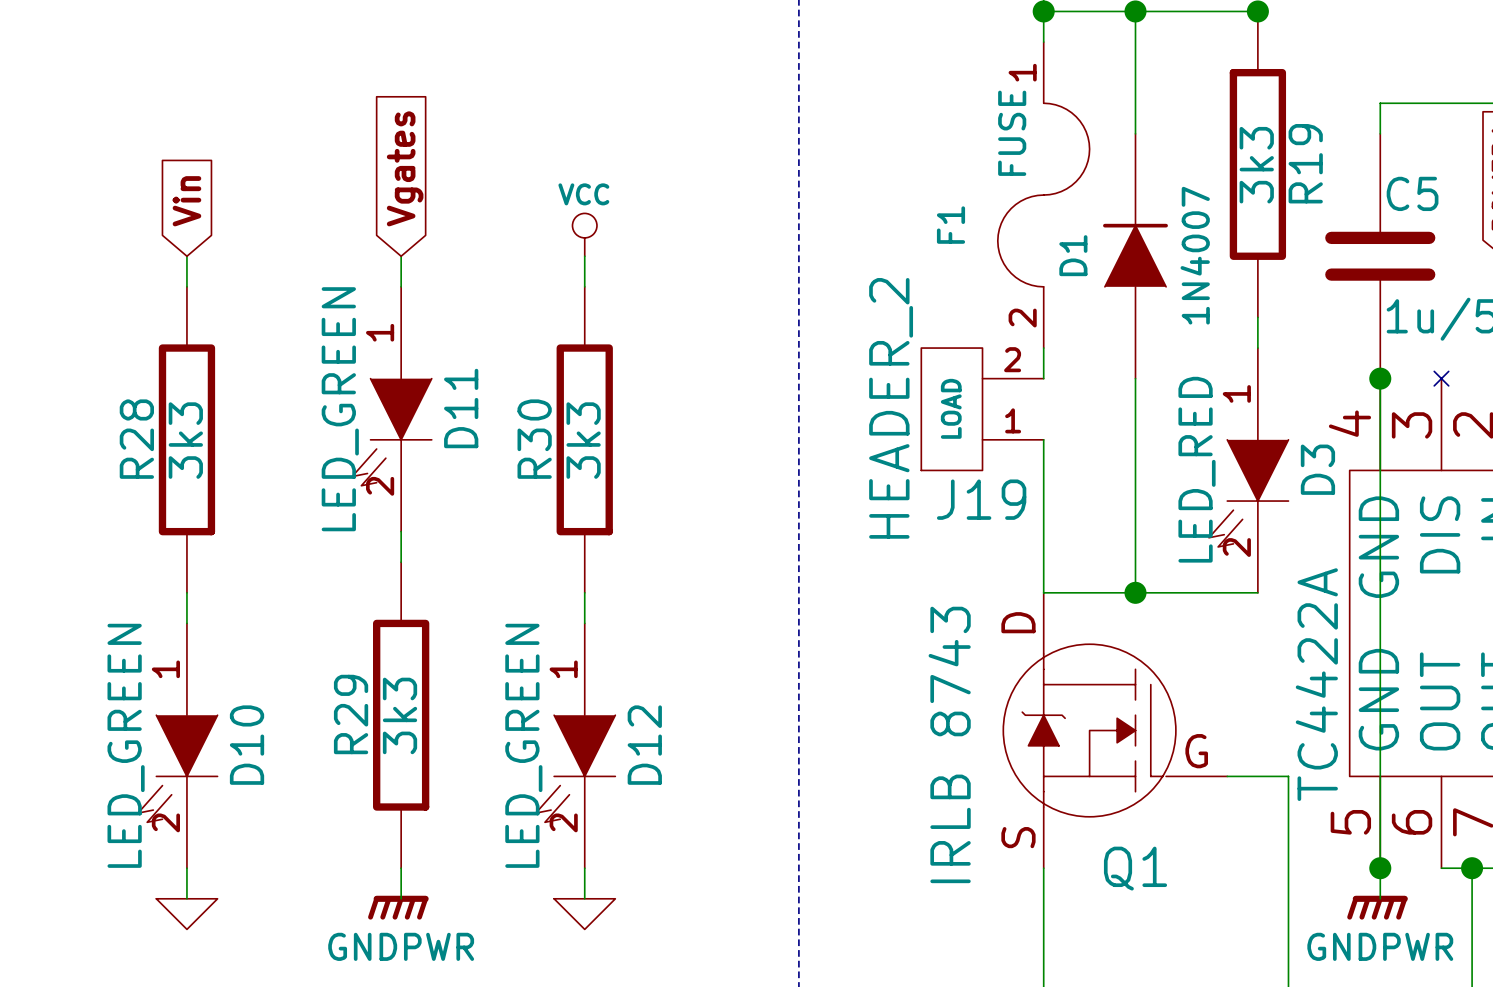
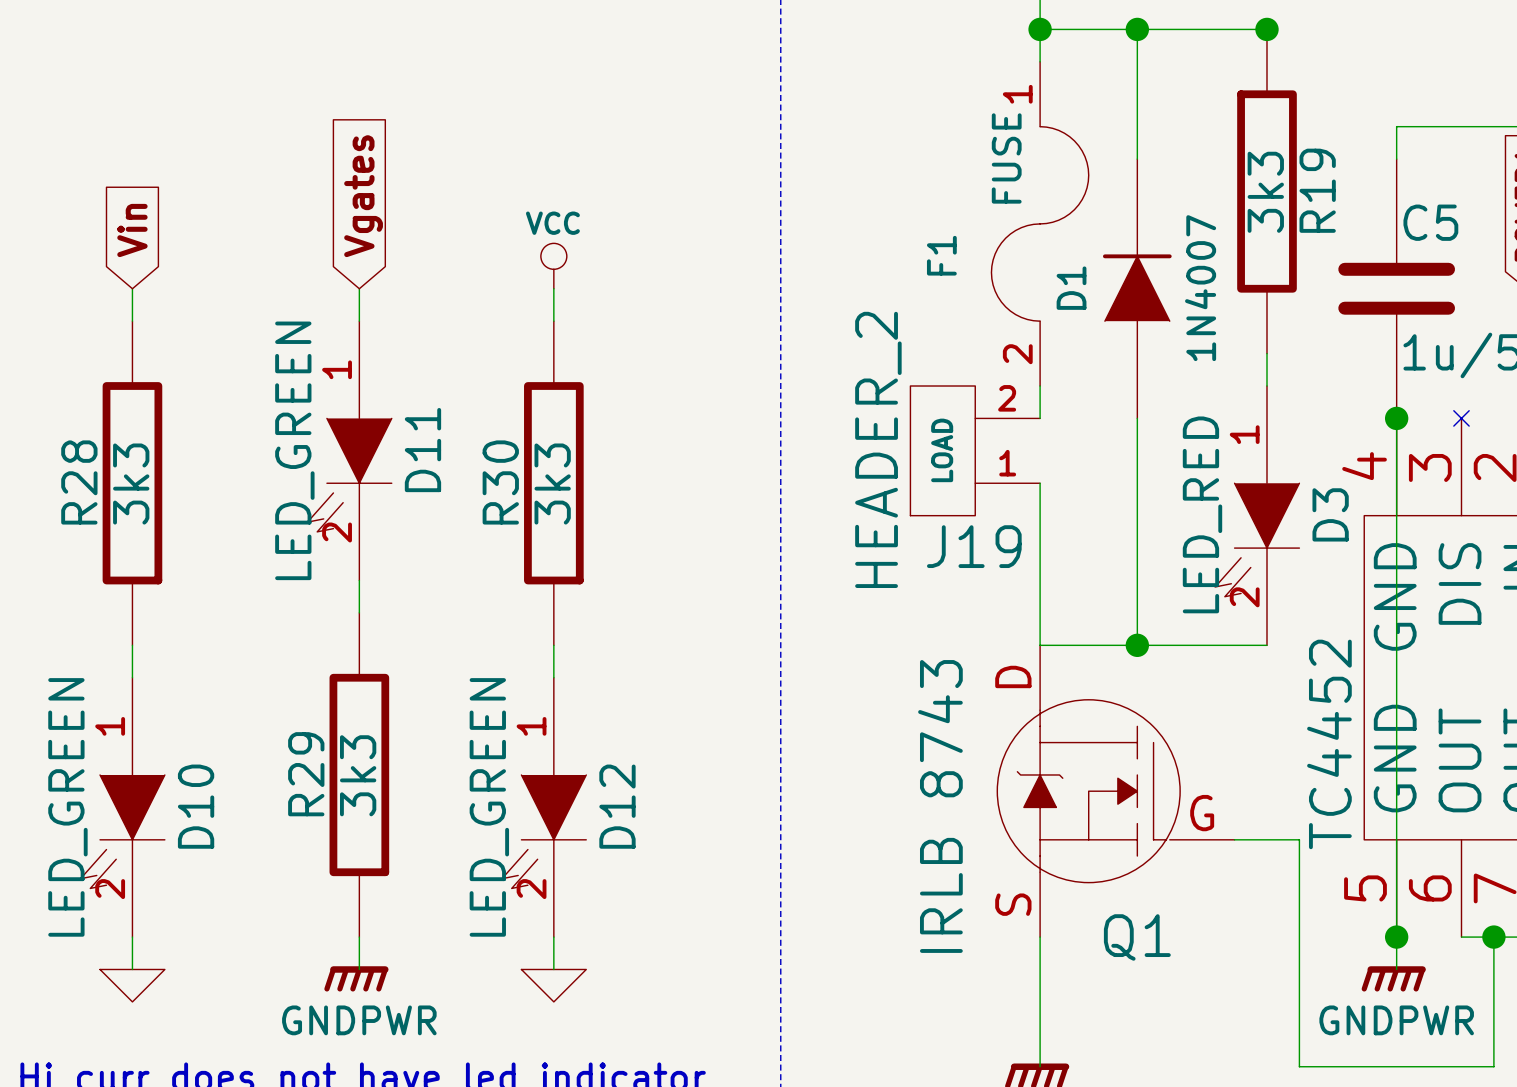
part value: TC4422A (1316, 684) -> TC4452 (1329, 744)

